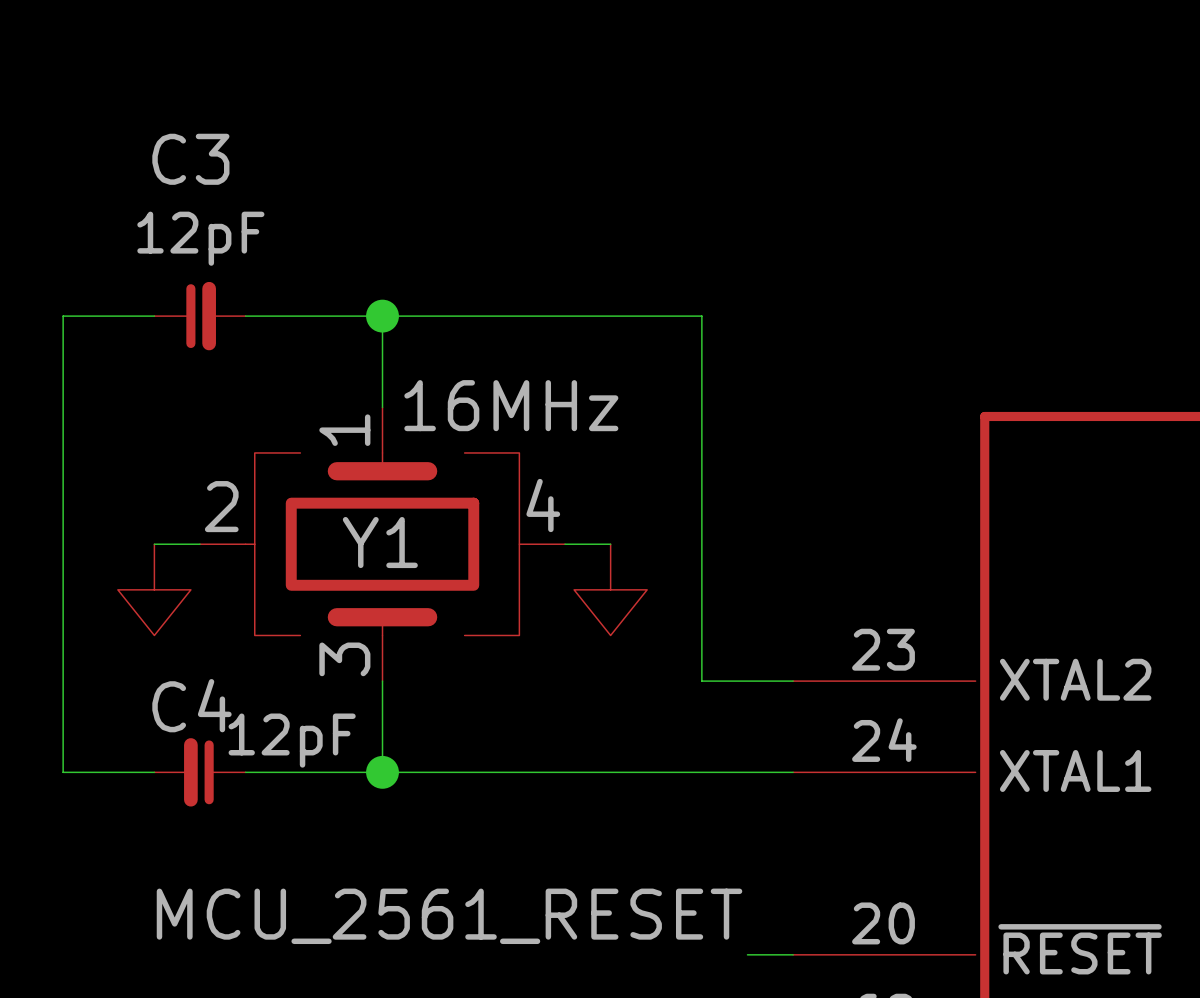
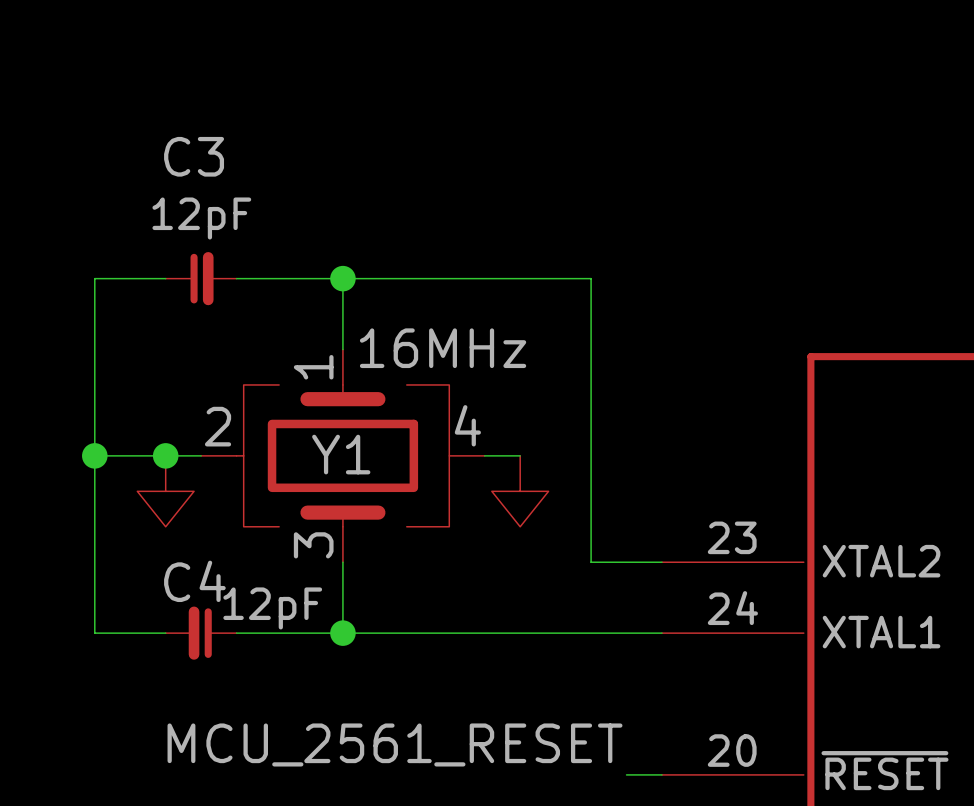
wire: none -> (94, 455) (165, 455)
junction: none -> (94, 455)
junction: none -> (165, 455)

